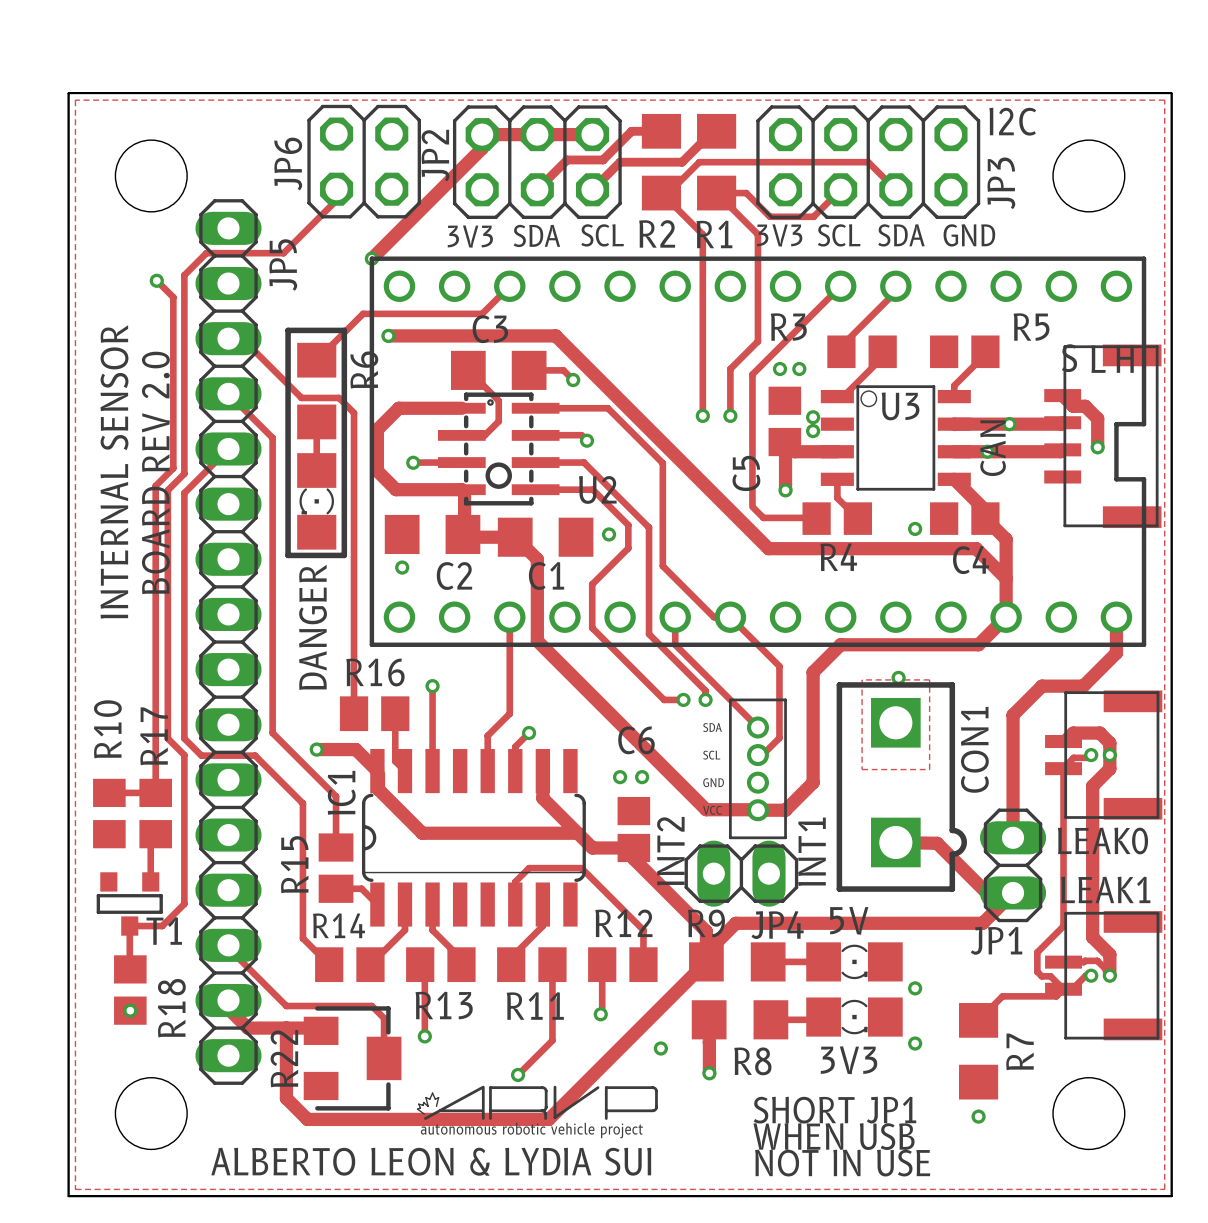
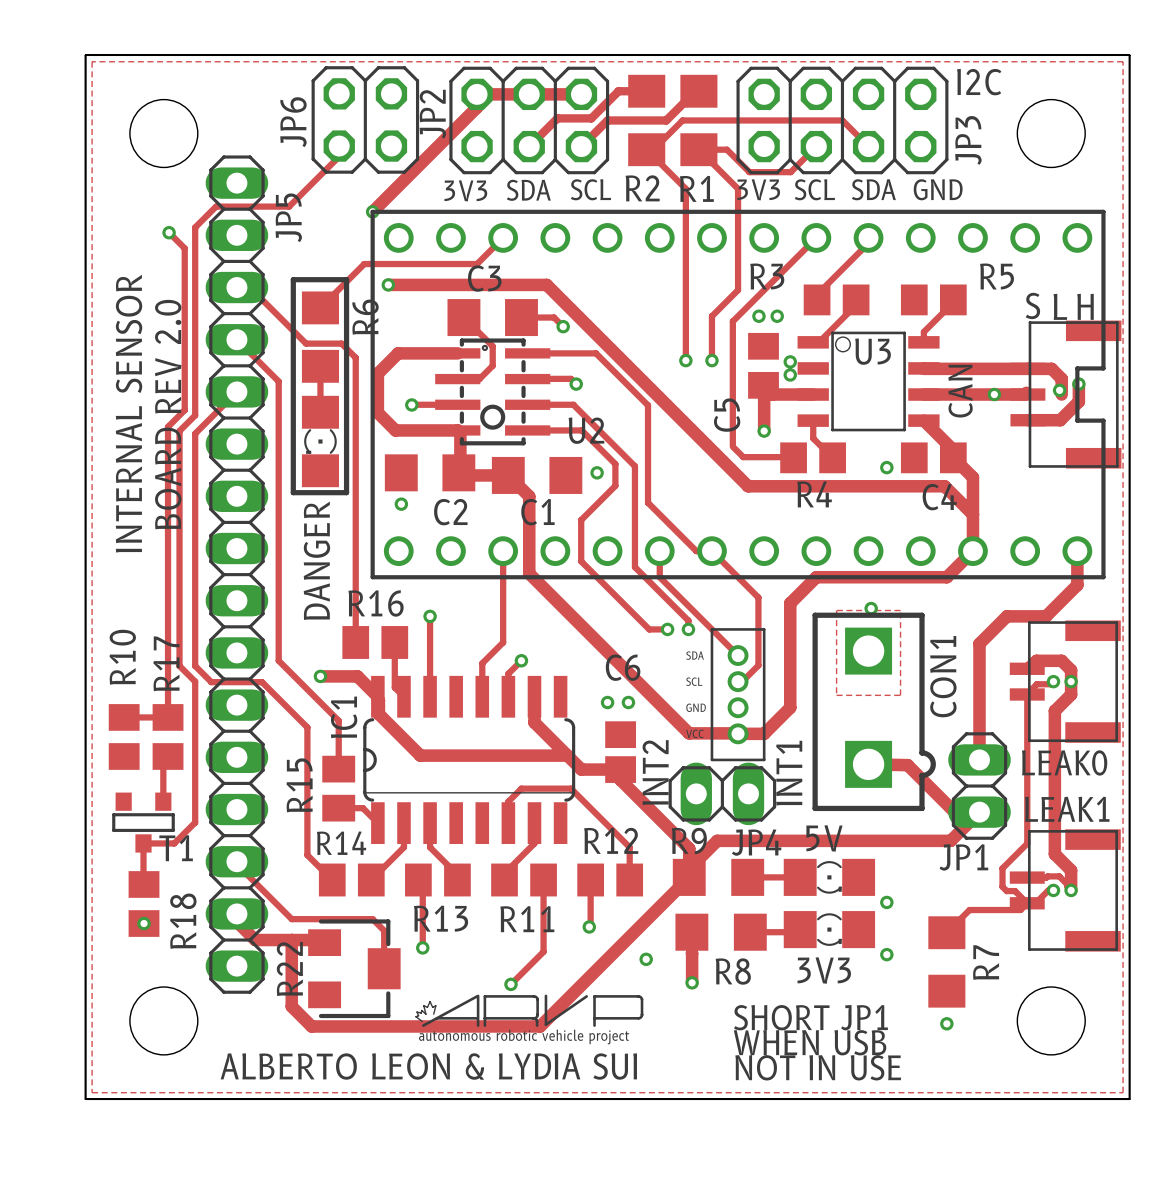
part footprint: [1044, 344, 1162, 529] -> [1010, 320, 1122, 469]
track: (1062, 395) (1073, 406) (1085, 406) (1097, 418) (1097, 447) -> none
track: (1062, 422) (954, 424) -> (1061, 394) (1061, 378) (1051, 368) (924, 368)
via: (1009, 424) -> none
track: none -> (1078, 384) (1078, 401) (1060, 420) (1027, 420)
via: none -> (1078, 384)
via: (987, 451) -> none
via: none -> (994, 394)

